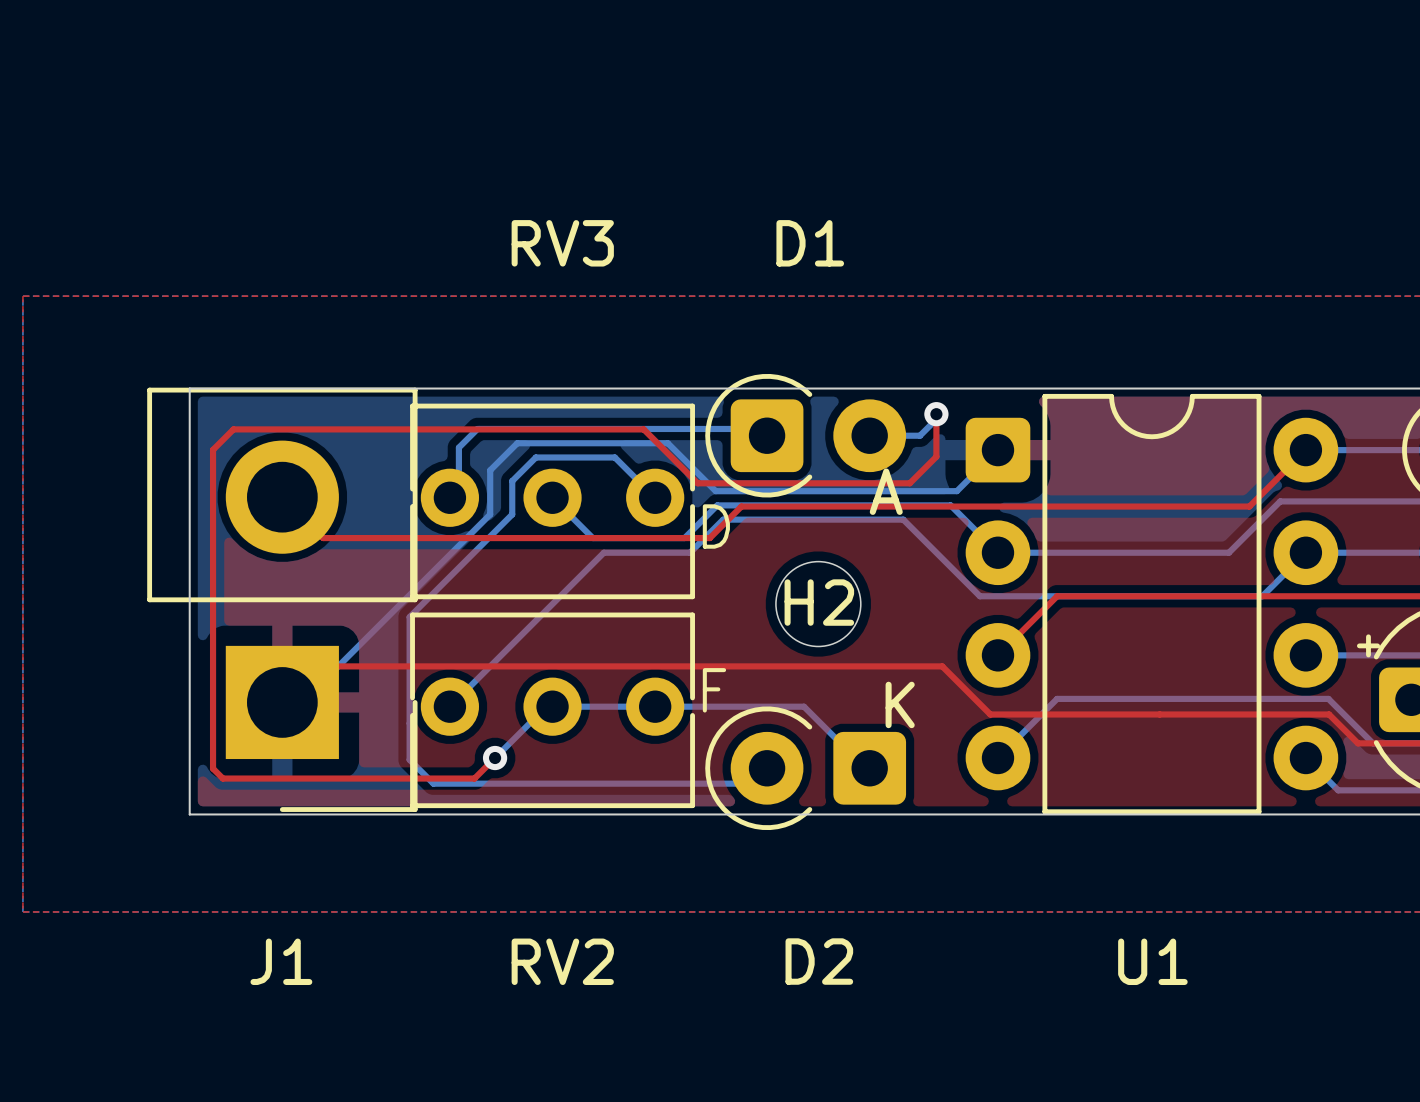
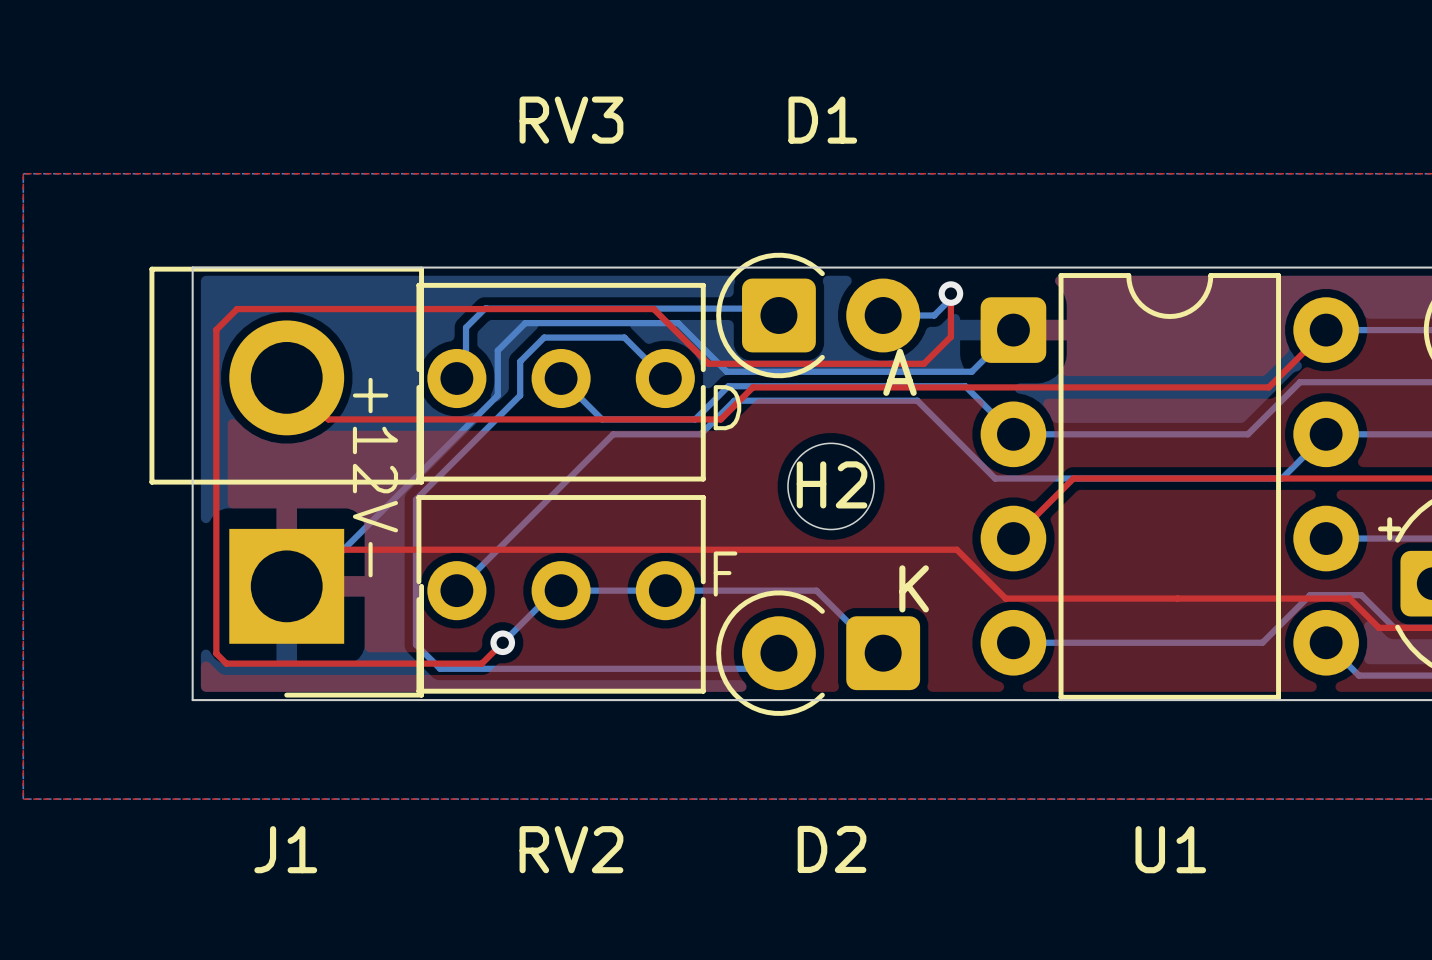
text: none -> +12V- (375, 477)
bottom track: (1340, 711) (1328, 698) (1057, 698) (997, 758) -> (1361, 595) (1310, 595) (1262, 642) (1013, 642)

